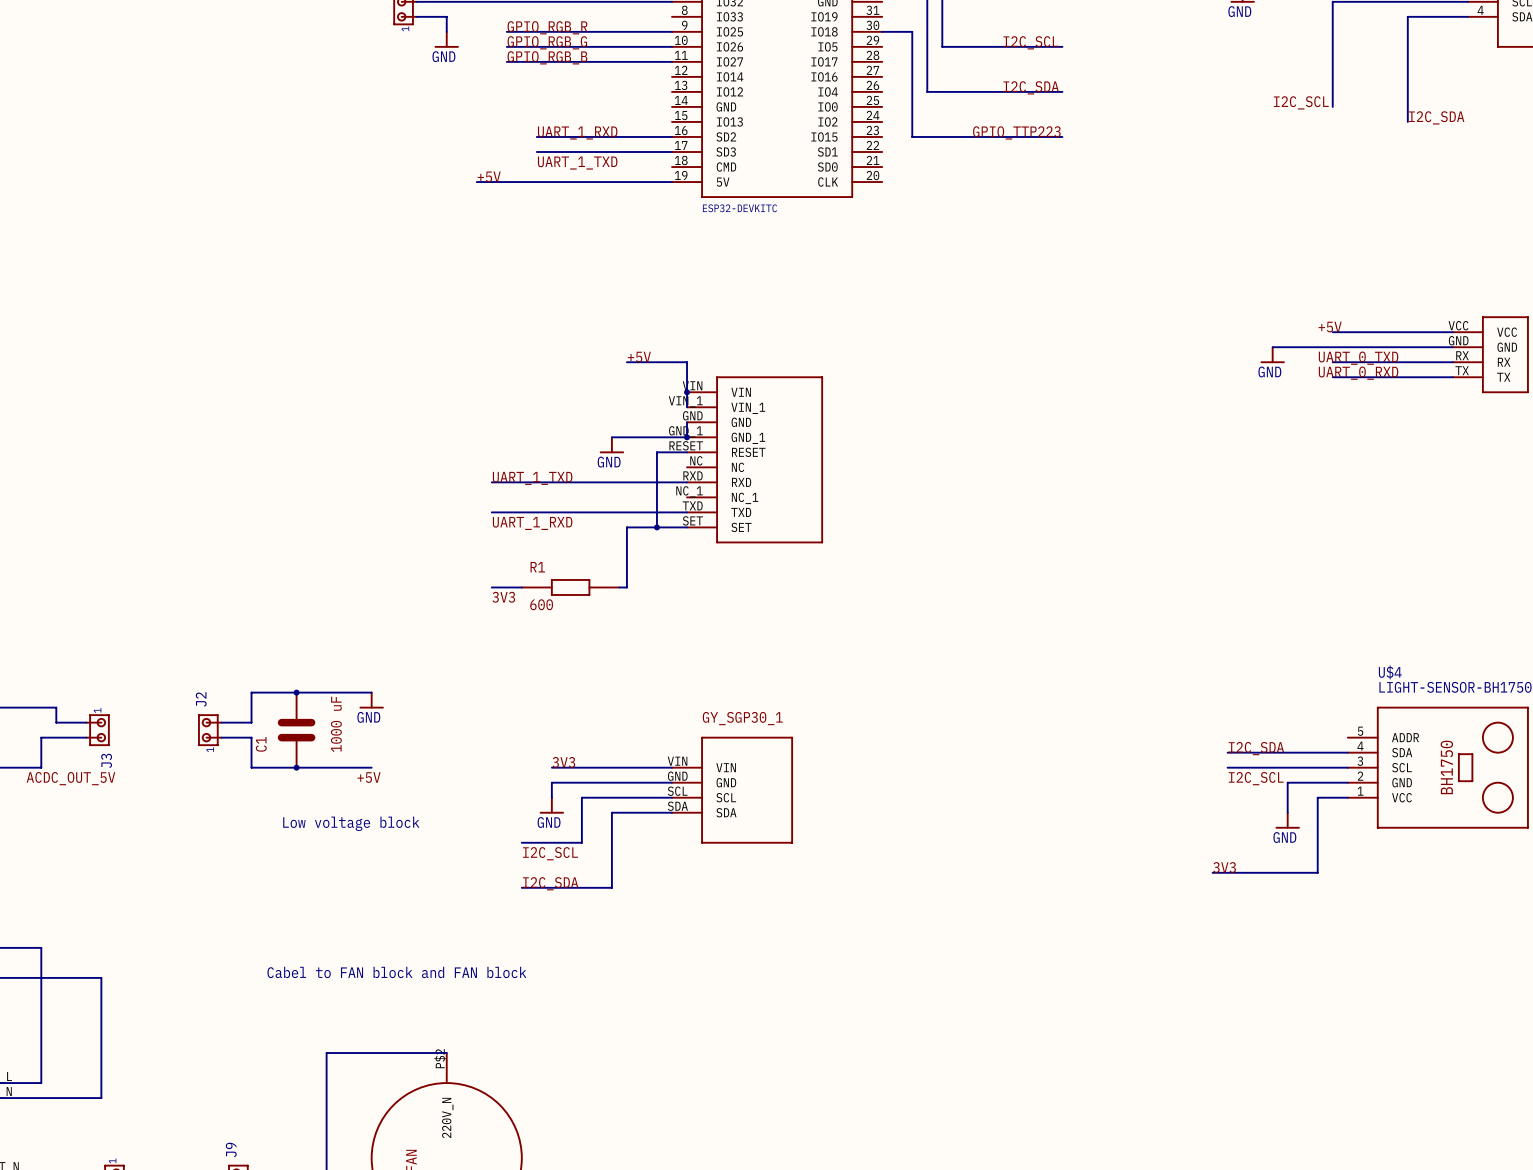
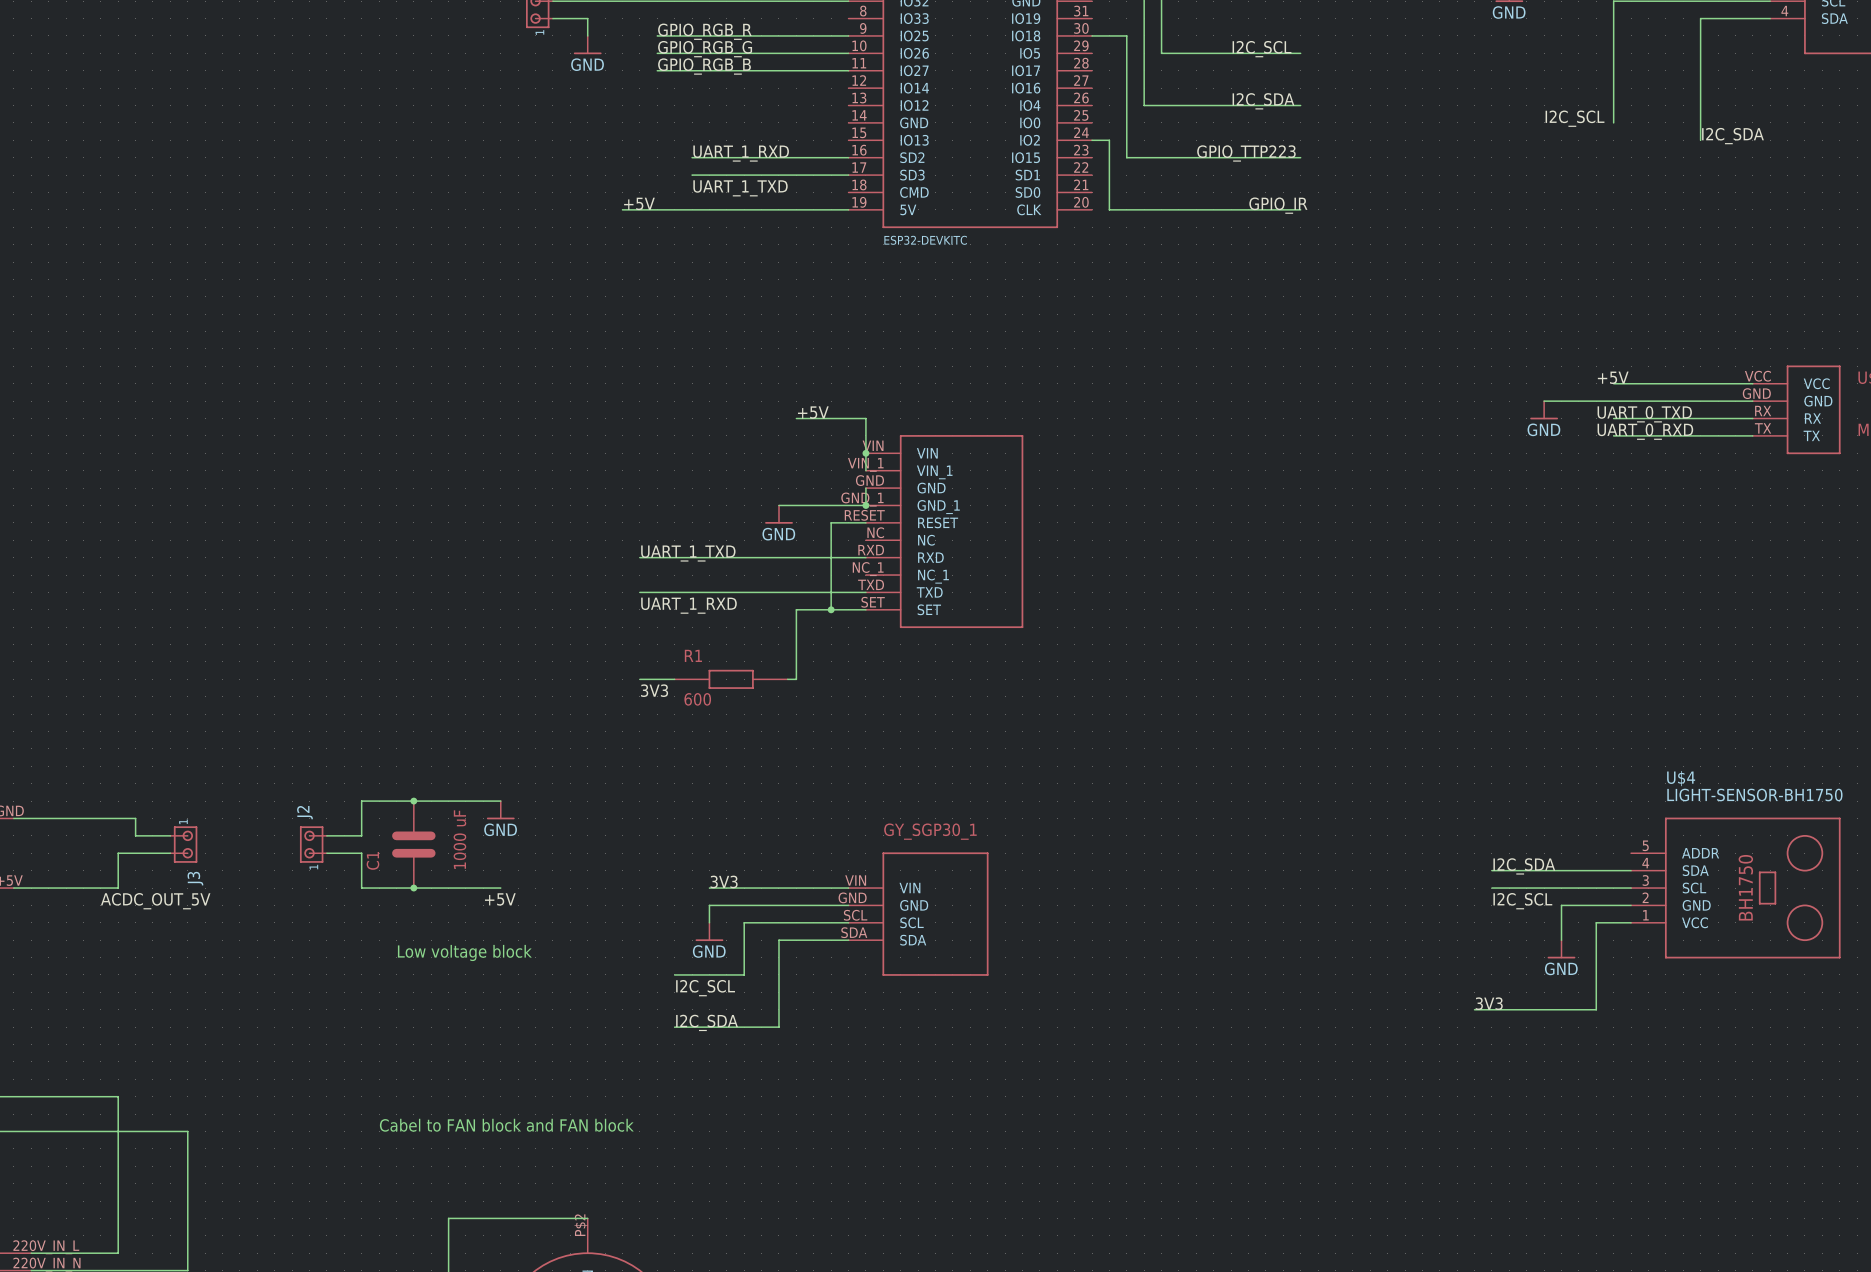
wire: none -> (1092, 140) (1109, 140) (1109, 209) (1300, 209)
label: none -> GPIO_IR (1278, 205)

